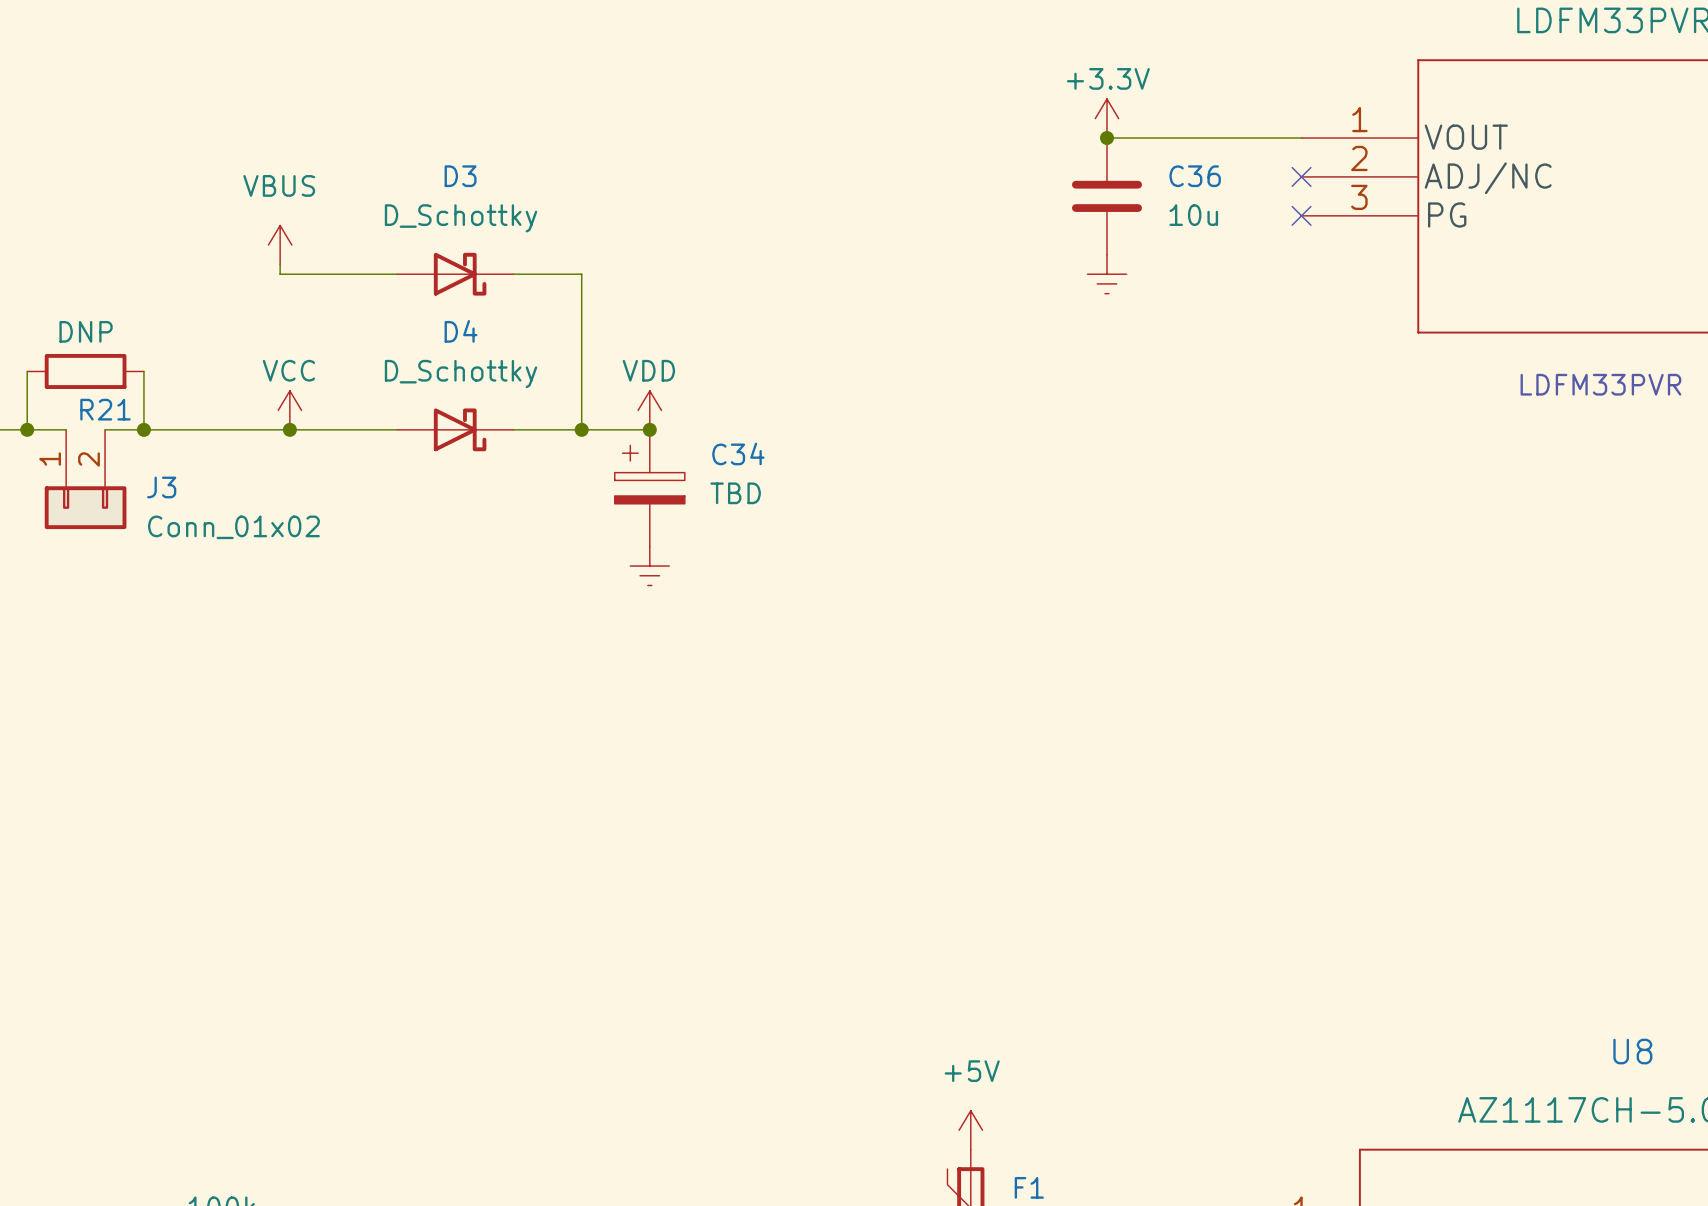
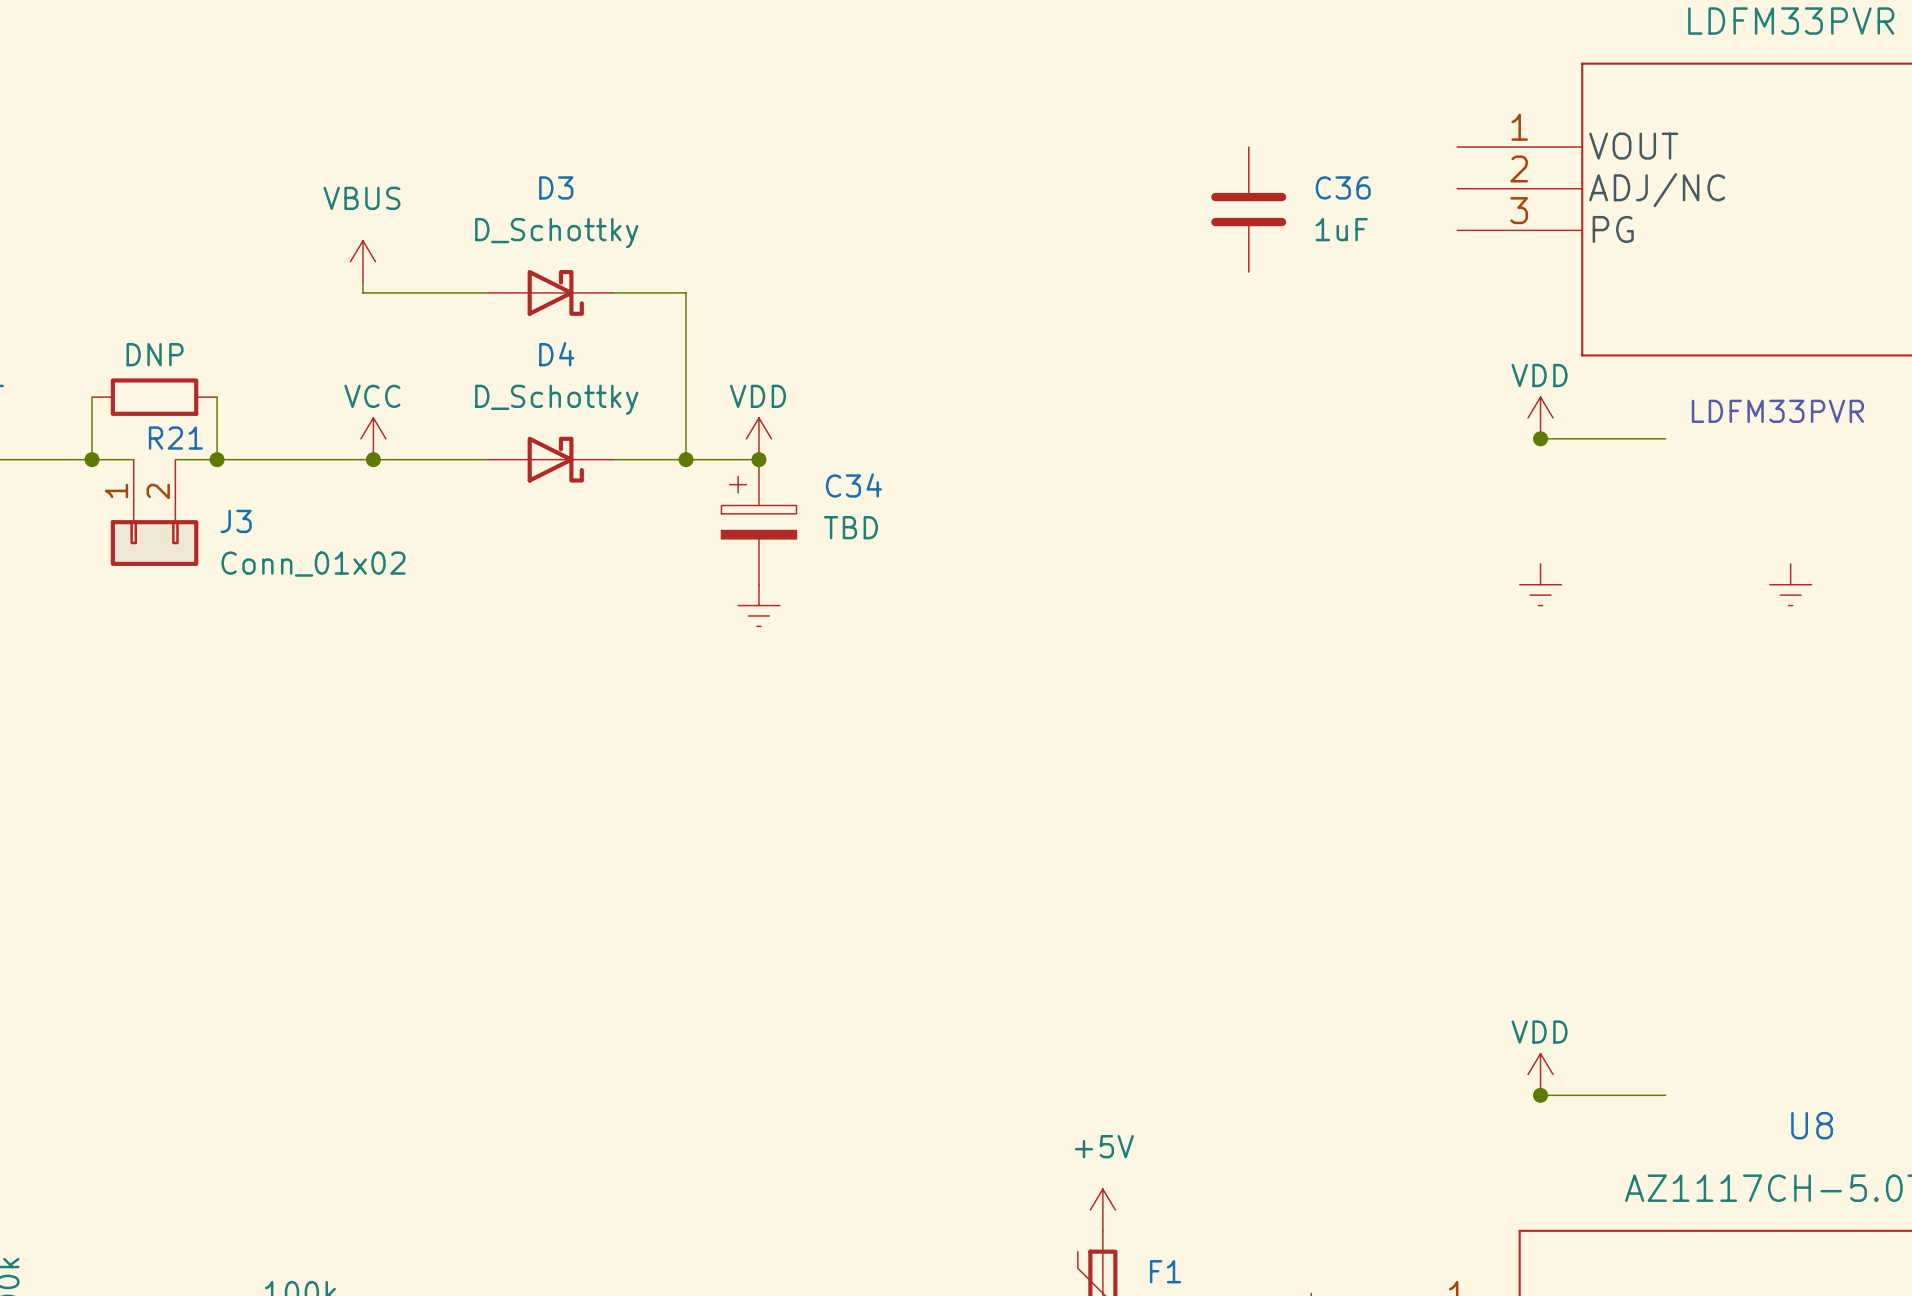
power symbol: +3.3V (1106, 118) -> none
wire: (1106, 138) (1301, 138) -> none
junction: (1106, 138) -> none
no-connect mark: (1301, 176) -> none
C36 value: 10u (1193, 215) -> 1uF (1341, 229)
no-connect mark: (1301, 215) -> none
power symbol: (1106, 274) -> none
power symbol: none -> VDD (1540, 417)
wire: none -> (1540, 438) (1665, 438)
junction: none -> (1540, 438)
power symbol: none -> (1540, 584)
power symbol: none -> (1790, 584)
power symbol: none -> VDD (1540, 1074)
wire: none -> (1540, 1095) (1665, 1095)
junction: none -> (1540, 1095)

